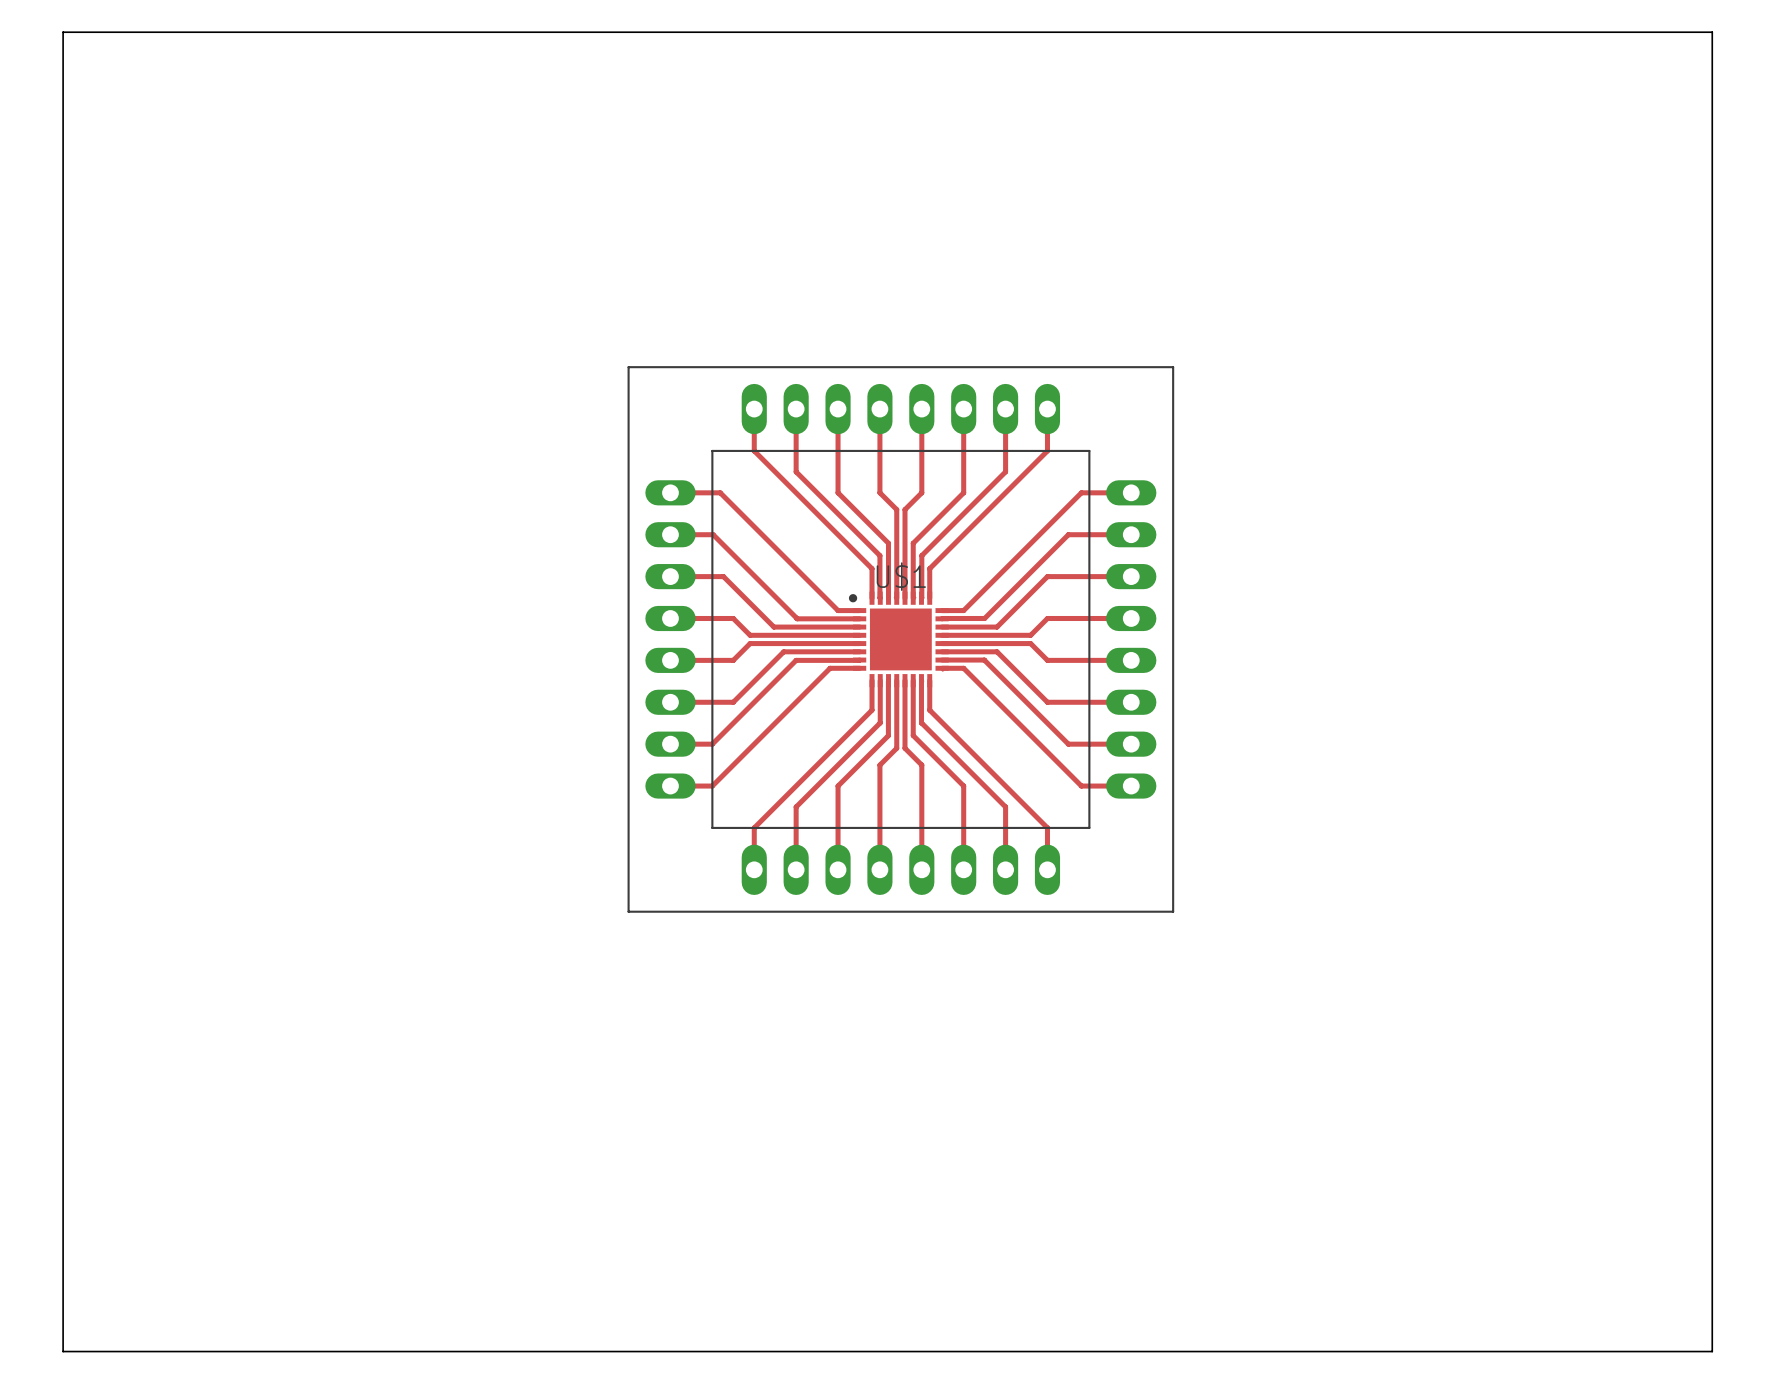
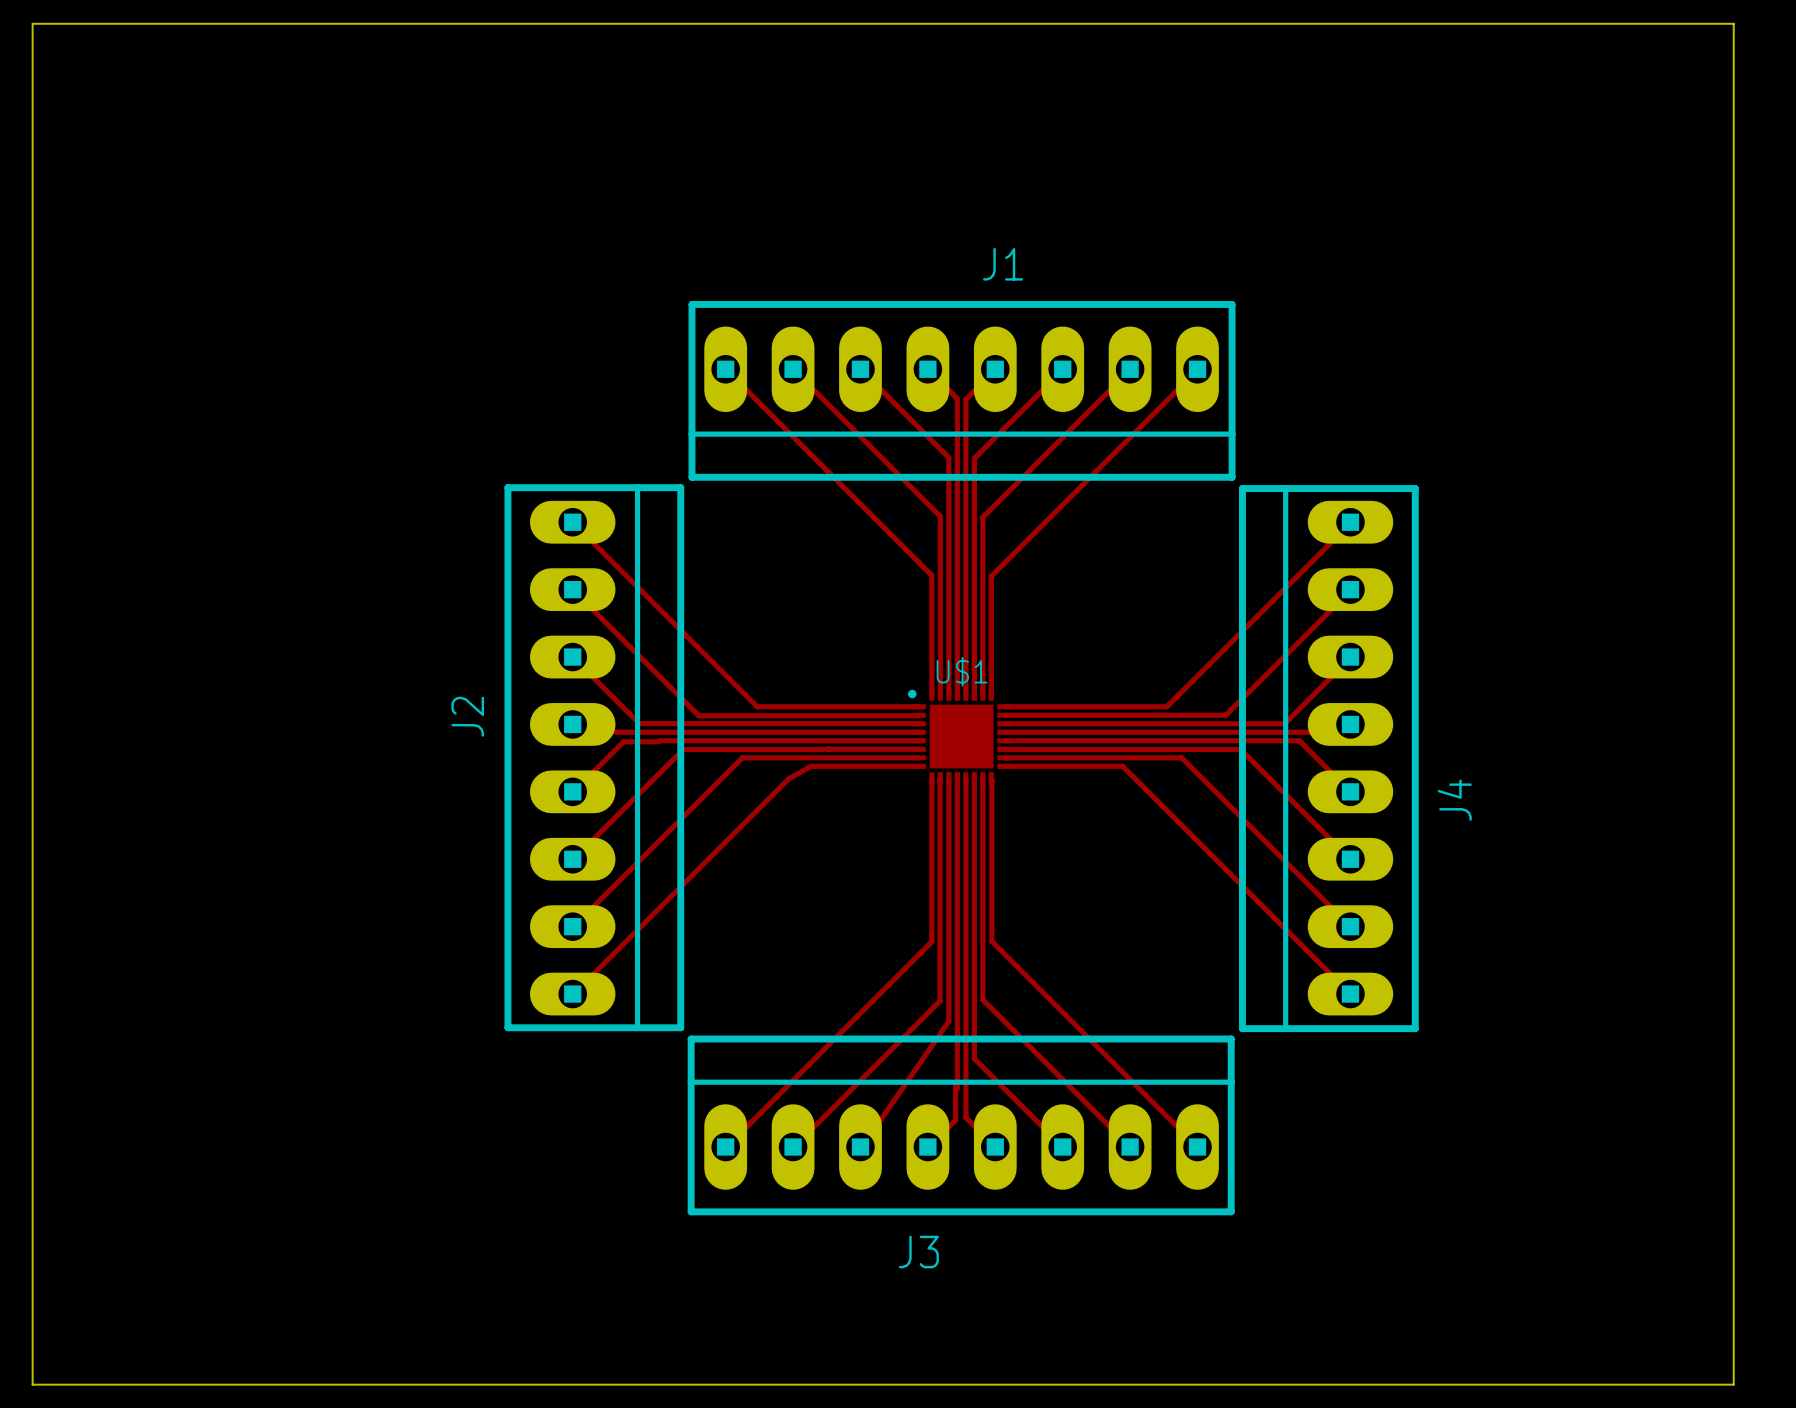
top track: none -> (725, 369) (931, 575) (931, 694)
top track: none -> (793, 369) (940, 516) (940, 694)
top track: none -> (860, 369) (948, 457) (948, 694)
top track: none -> (927, 369) (957, 398) (957, 694)
top track: none -> (995, 369) (965, 399) (965, 694)
top track: none -> (1062, 369) (974, 458) (974, 694)
top track: none -> (1130, 369) (982, 517) (982, 694)
top track: none -> (1197, 369) (991, 576) (991, 694)
J1: none -> (962, 390)
top track: (754, 409) (754, 450) (872, 568) (872, 598) -> none
top track: (796, 409) (796, 471) (879, 555) (880, 598) -> none
top track: (838, 409) (838, 492) (888, 543) (887, 597) -> none
top track: (879, 409) (879, 492) (896, 509) (896, 598) (895, 597) -> none
top track: (920, 409) (921, 409) (921, 492) (904, 509) (905, 597) -> none
top track: (962, 409) (963, 492) (913, 543) (913, 598) (915, 597) -> none
top track: (1005, 409) (1005, 471) (921, 555) (922, 597) -> none
top track: (1045, 409) (1047, 409) (1047, 450) (929, 568) (930, 597) -> none
top track: (670, 492) (720, 492) (838, 610) (859, 610) -> none
top track: (1131, 494) (1131, 492) (1081, 492) (963, 610) (942, 610) -> none
top track: none -> (572, 522) (757, 706) (919, 706)
top track: none -> (1350, 522) (1166, 706) (1004, 706)
top track: (670, 534) (713, 534) (797, 618) (859, 618) -> none
top track: (1131, 534) (1068, 534) (984, 618) (942, 617) -> none
top track: (670, 576) (723, 576) (773, 627) (859, 627) -> none
top track: (1131, 576) (1047, 576) (997, 627) (942, 627) -> none
top track: none -> (572, 589) (698, 715) (919, 715)
top track: none -> (1350, 589) (1225, 715) (1004, 715)
top track: (670, 618) (733, 618) (750, 635) (859, 635) (857, 635) -> none
top track: (1131, 618) (1047, 618) (1030, 635) (942, 635) -> none
U$1 position: (898, 639) -> (959, 736)
part: (900, 639) -> none
top track: (859, 643) (750, 643) (733, 660) (670, 660) -> none
top track: (942, 643) (1030, 643) (1047, 660) (1131, 660) -> none
top track: none -> (572, 657) (639, 723) (919, 723)
top track: none -> (1350, 657) (1284, 723) (1004, 723)
top track: (857, 652) (859, 651) (783, 651) (733, 702) (670, 702) -> none
top track: (942, 652) (997, 651) (1047, 702) (1131, 702) -> none
top track: (857, 660) (859, 660) (796, 660) (712, 744) (670, 744) -> none
top track: (942, 660) (984, 660) (1068, 744) (1131, 743) -> none
top track: (859, 668) (830, 668) (712, 786) (670, 786) -> none
top track: (942, 670) (942, 668) (963, 668) (1081, 786) (1131, 786) -> none
top track: (872, 680) (872, 710) (754, 827) (754, 869) -> none
top track: (896, 680) (896, 748) (879, 765) (879, 869) -> none
top track: (904, 680) (904, 748) (921, 765) (921, 869) -> none
top track: (913, 680) (913, 735) (963, 786) (963, 869) -> none
top track: (888, 681) (888, 735) (838, 786) (838, 869) -> none
top track: (921, 681) (921, 722) (1005, 806) (1005, 868) -> none
top track: (879, 683) (880, 680) (880, 722) (796, 806) (796, 869) -> none
top track: (930, 683) (929, 680) (929, 710) (1047, 827) (1047, 869) -> none
top track: none -> (1328, 714) (1311, 732) (1004, 732)
top track: none -> (572, 724) (579, 731) (616, 732) (919, 732) (916, 732)
top track: none -> (919, 740) (623, 741) (572, 791)
top track: none -> (1004, 740) (1299, 740) (1350, 791)
top track: none -> (819, 749) (919, 749)
top track: none -> (819, 749) (683, 749) (572, 859)
top track: none -> (1004, 749) (1240, 749) (1350, 859)
J2: none -> (594, 757)
top track: none -> (919, 757) (742, 757) (572, 926)
top track: none -> (1005, 757) (1181, 757) (1350, 926)
J4: none -> (1328, 758)
top track: none -> (919, 766) (811, 766) (789, 778) (572, 994)
top track: none -> (1004, 766) (1122, 766) (1350, 994)
top track: none -> (931, 779) (931, 941) (725, 1147)
top track: none -> (948, 779) (948, 1021) (860, 1147)
top track: none -> (957, 779) (957, 1088) (955, 1086) (955, 1120) (927, 1147)
top track: none -> (965, 779) (965, 1117) (995, 1147)
top track: none -> (974, 779) (974, 1058) (1062, 1147)
top track: none -> (982, 779) (982, 999) (1130, 1147)
top track: none -> (940, 781) (940, 779) (940, 1000) (793, 1147)
top track: none -> (991, 781) (991, 779) (991, 941) (1197, 1147)
J3: none -> (961, 1125)

